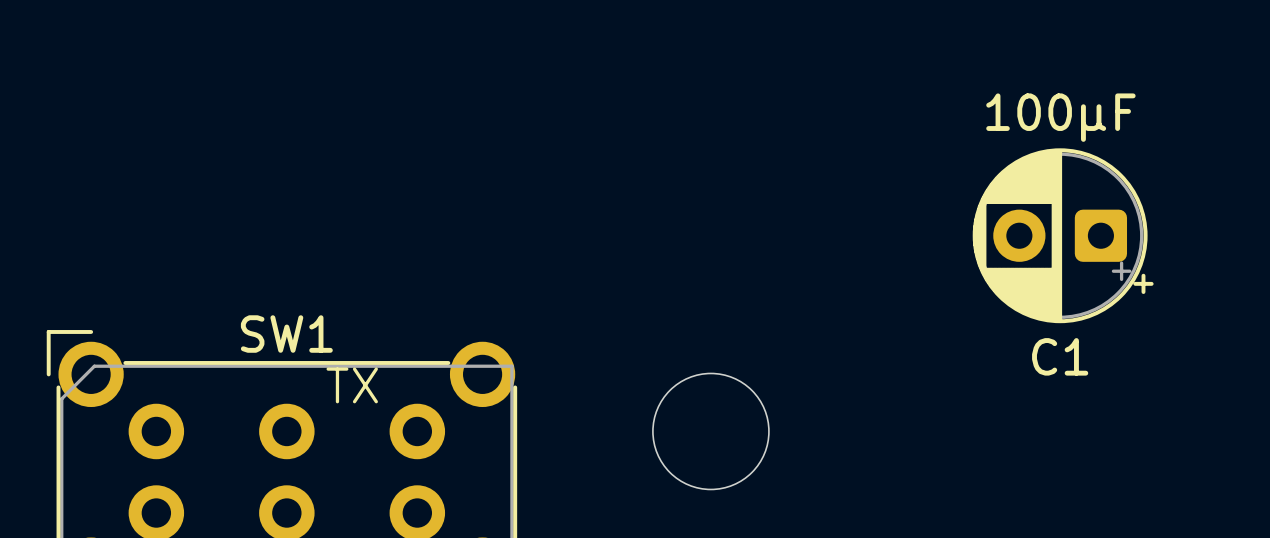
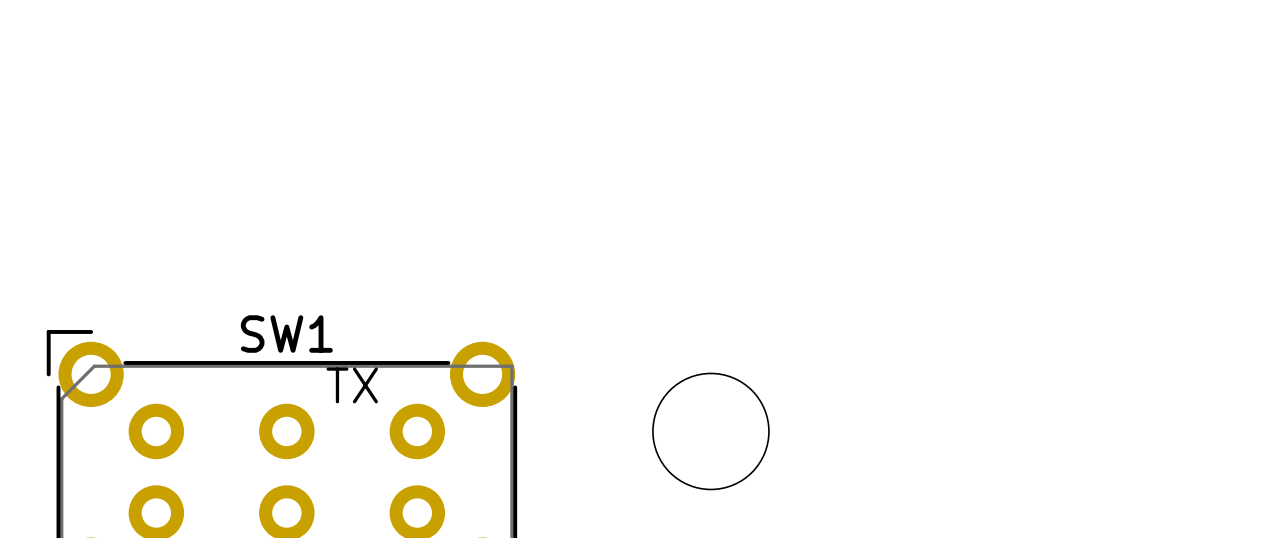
C1: 100µF (1063, 235) -> none

